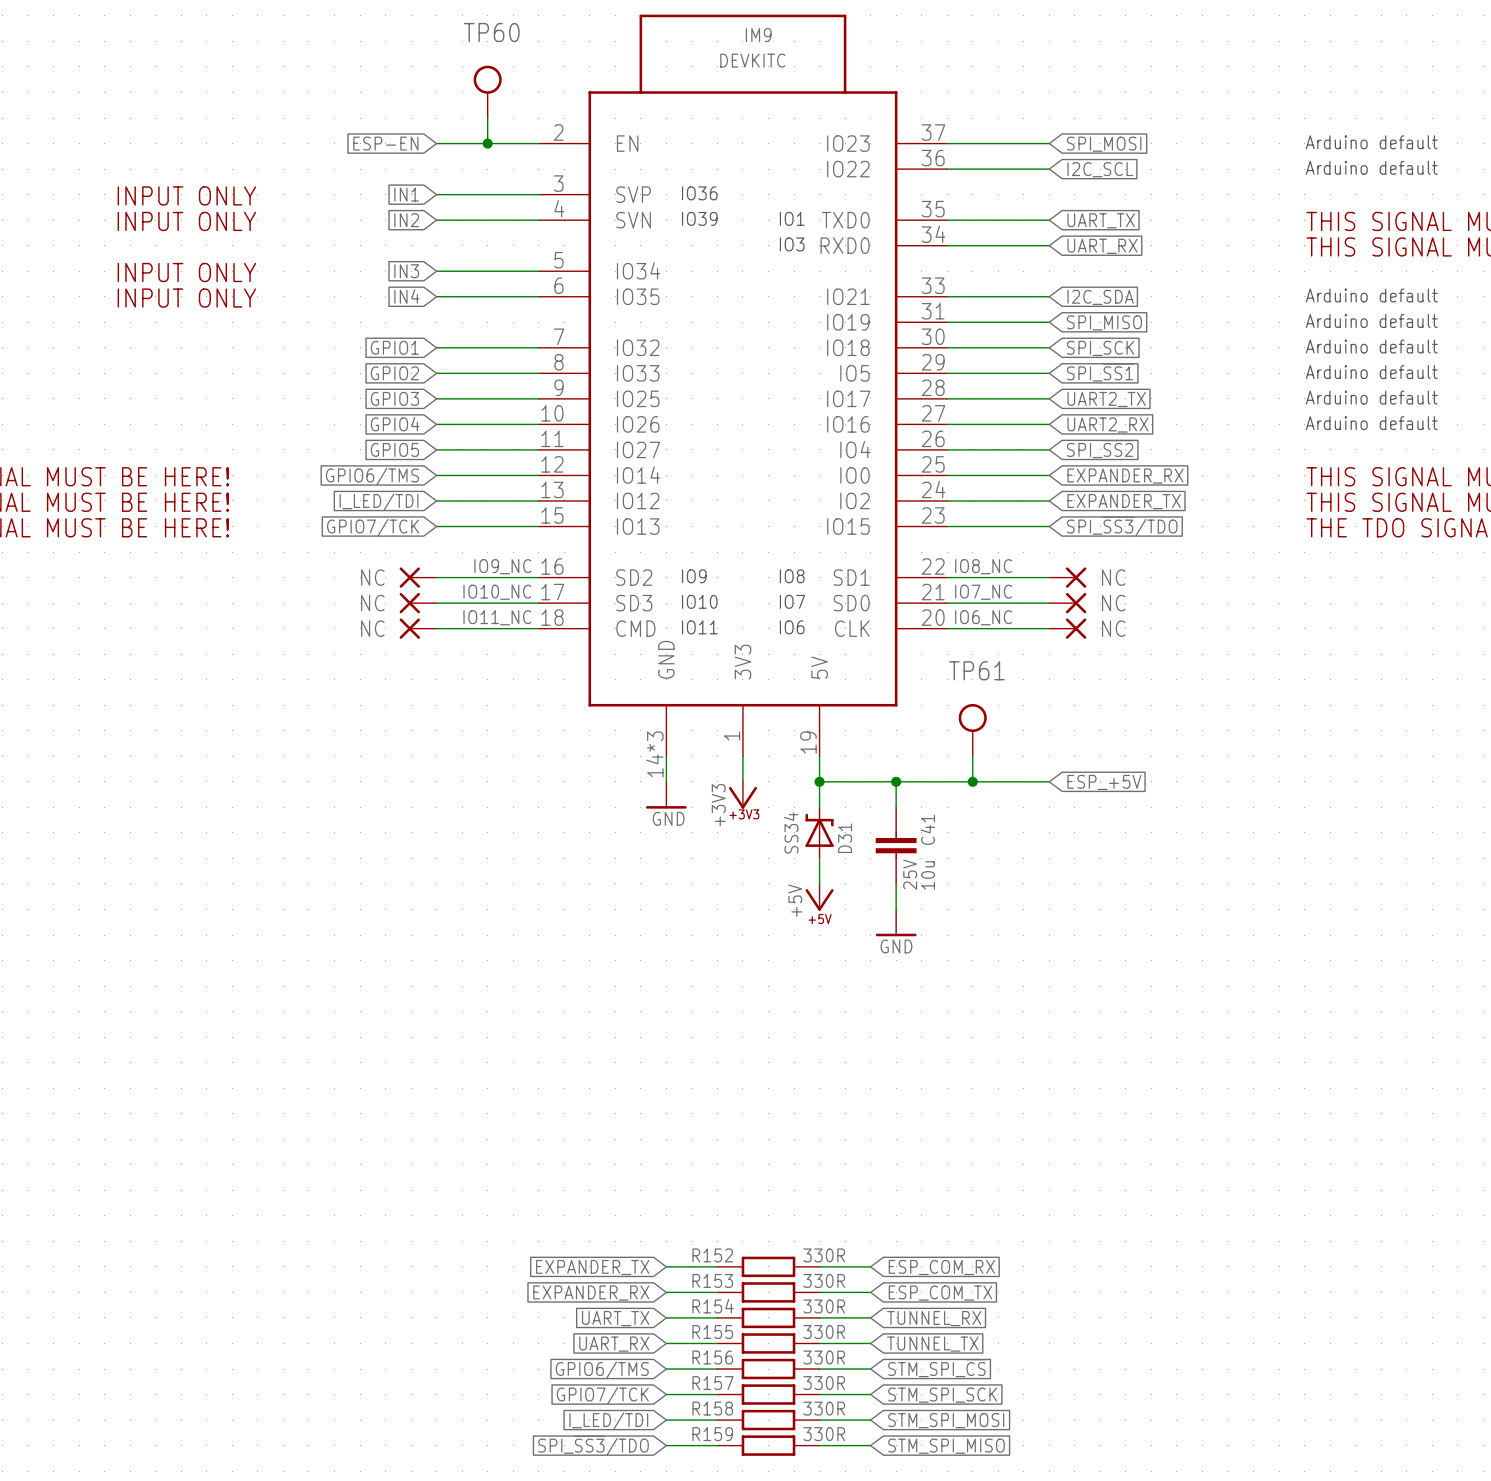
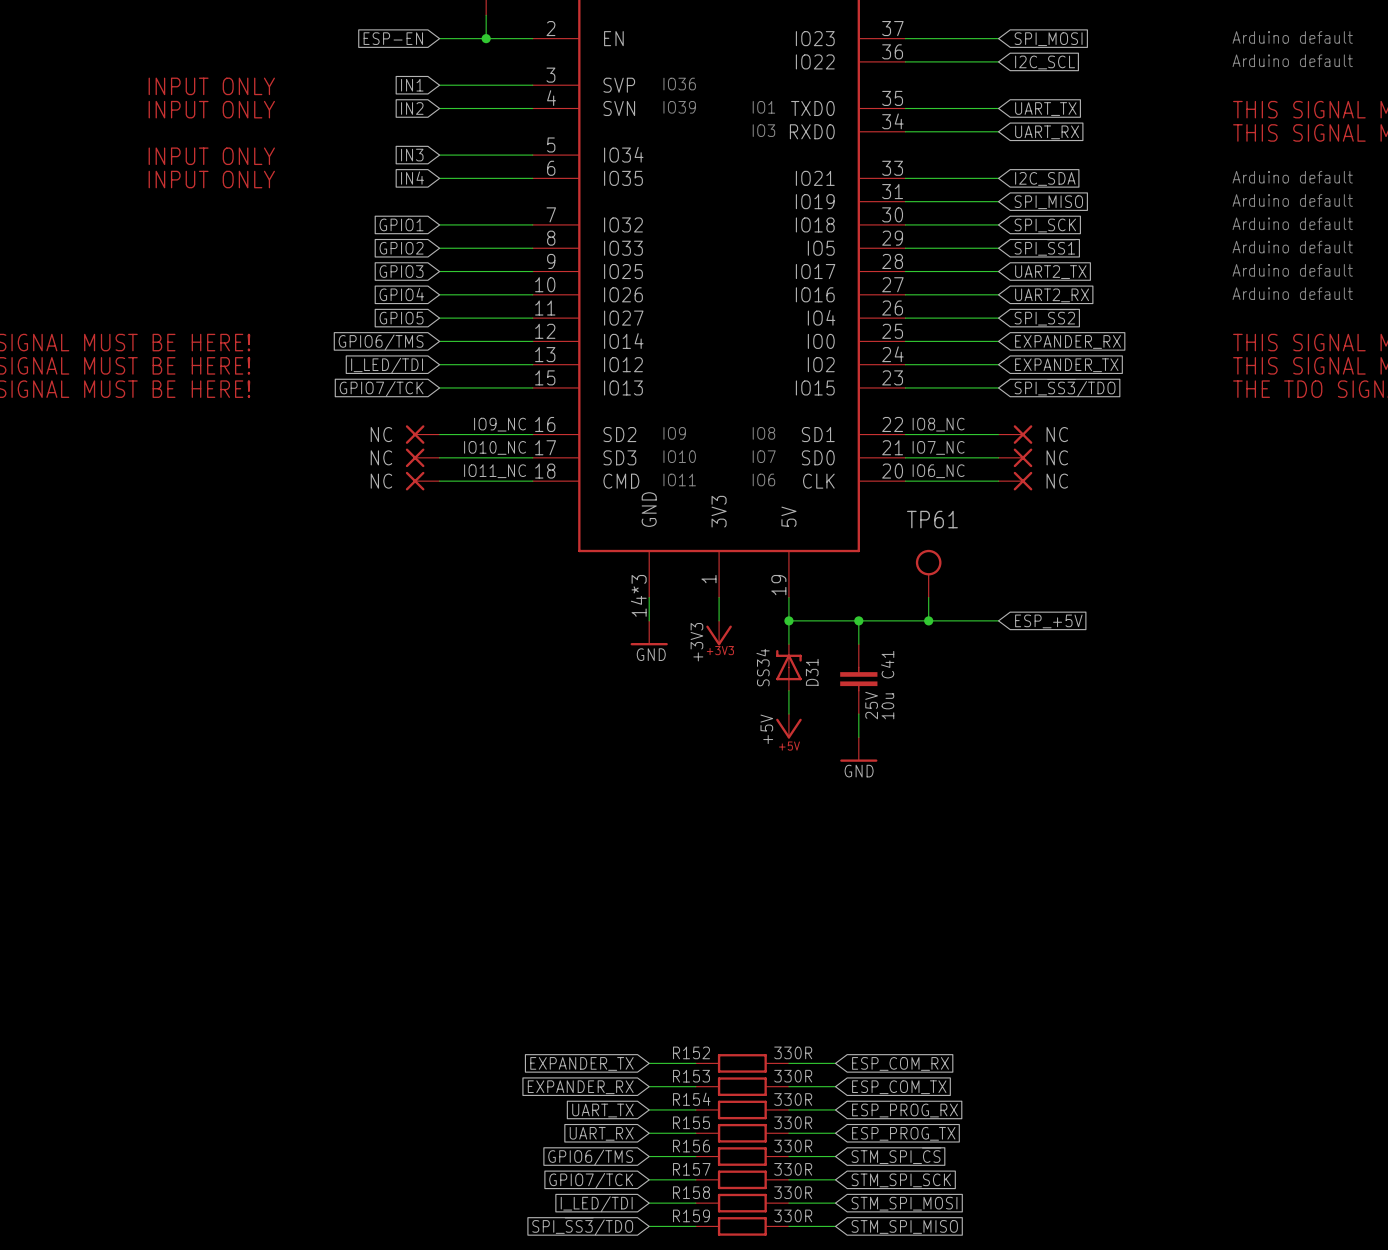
global label: TUNNEL_RX (934, 1318) -> ESP_PROG_RX (905, 1110)
global label: TUNNEL_TX (932, 1344) -> ESP_PROG_TX (903, 1133)

